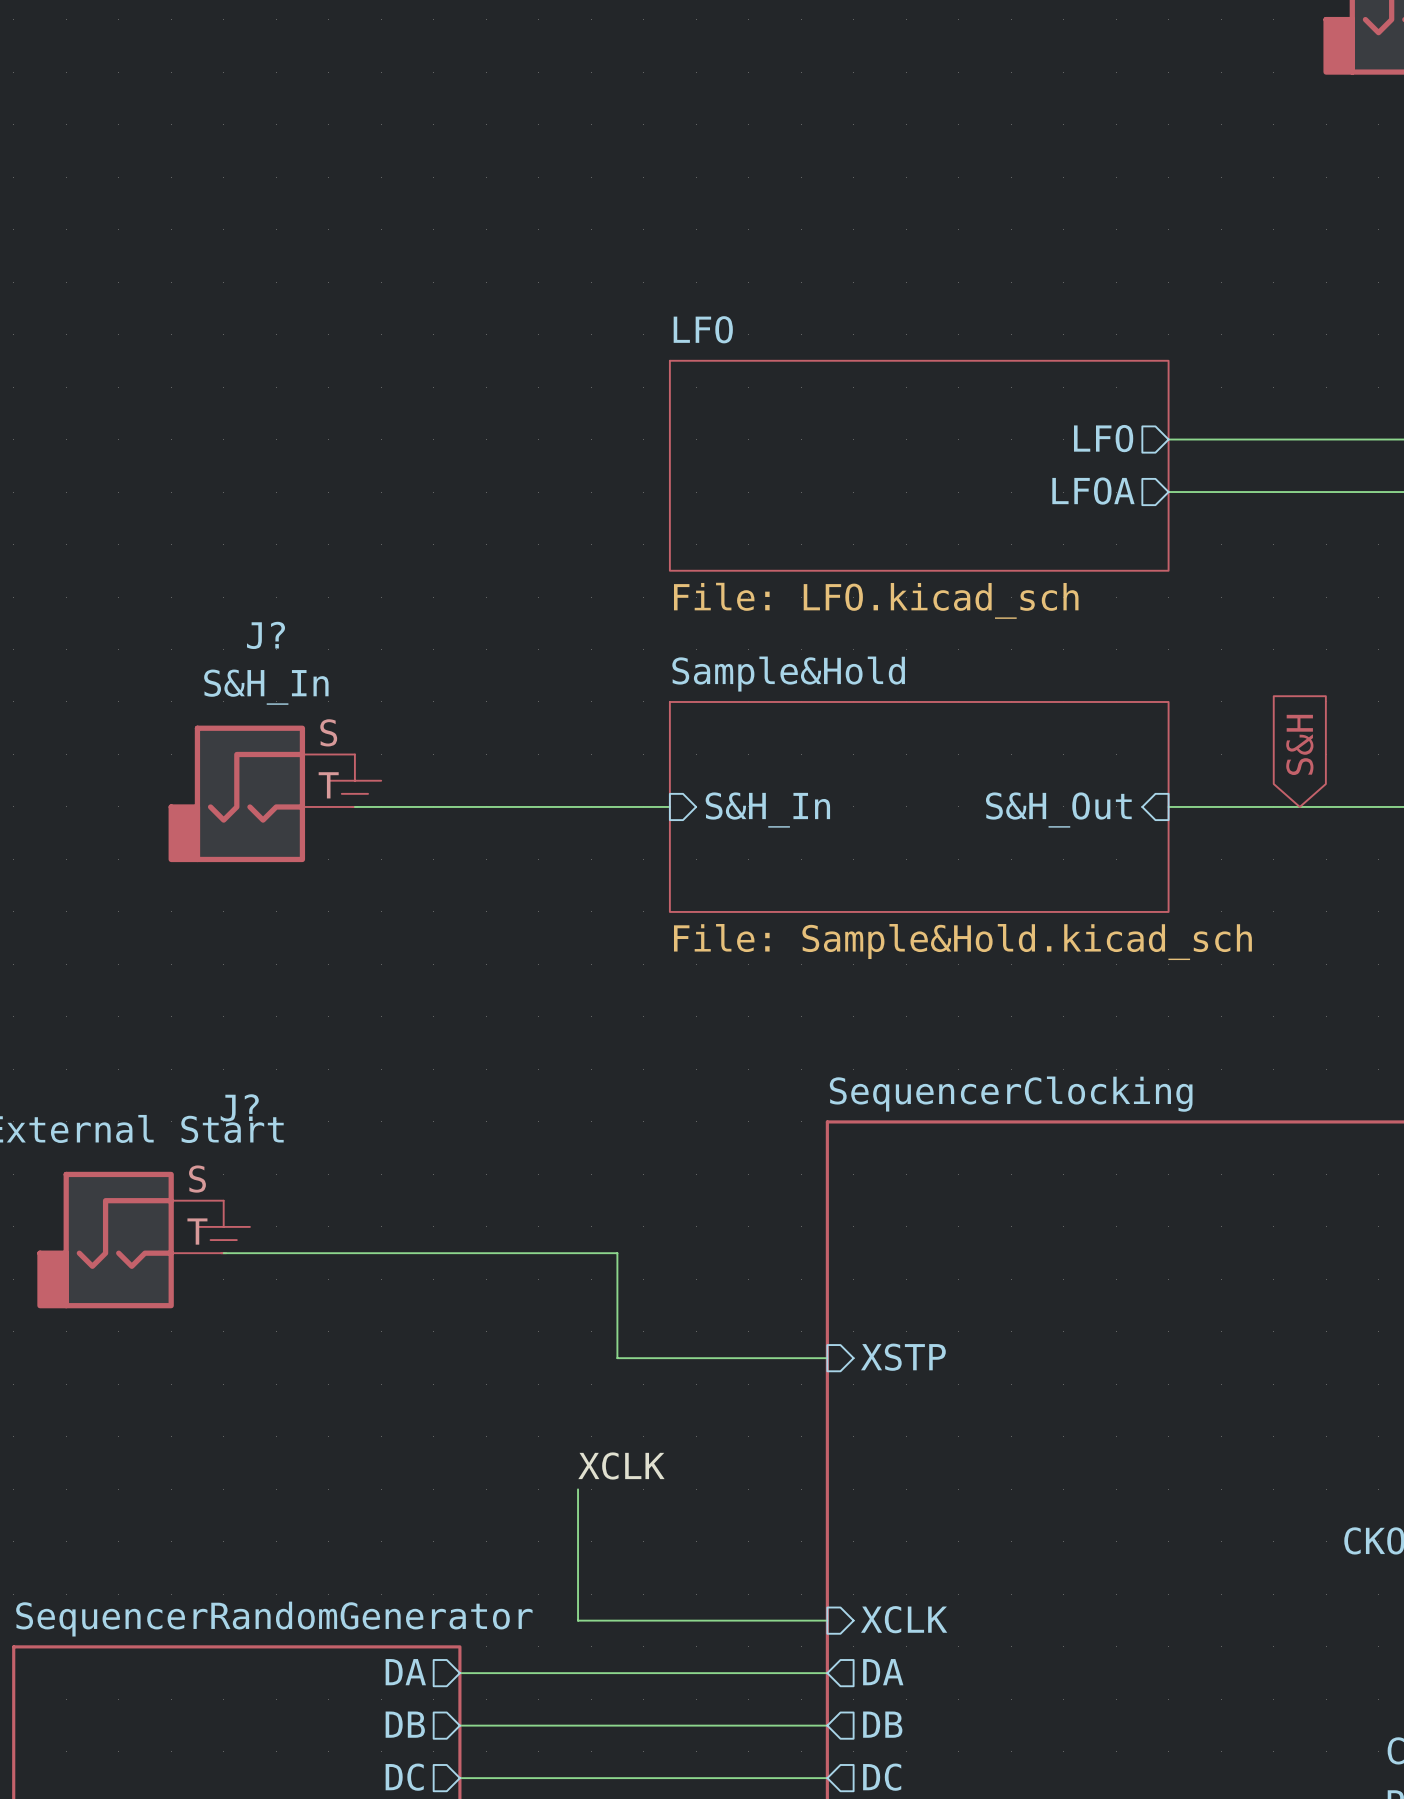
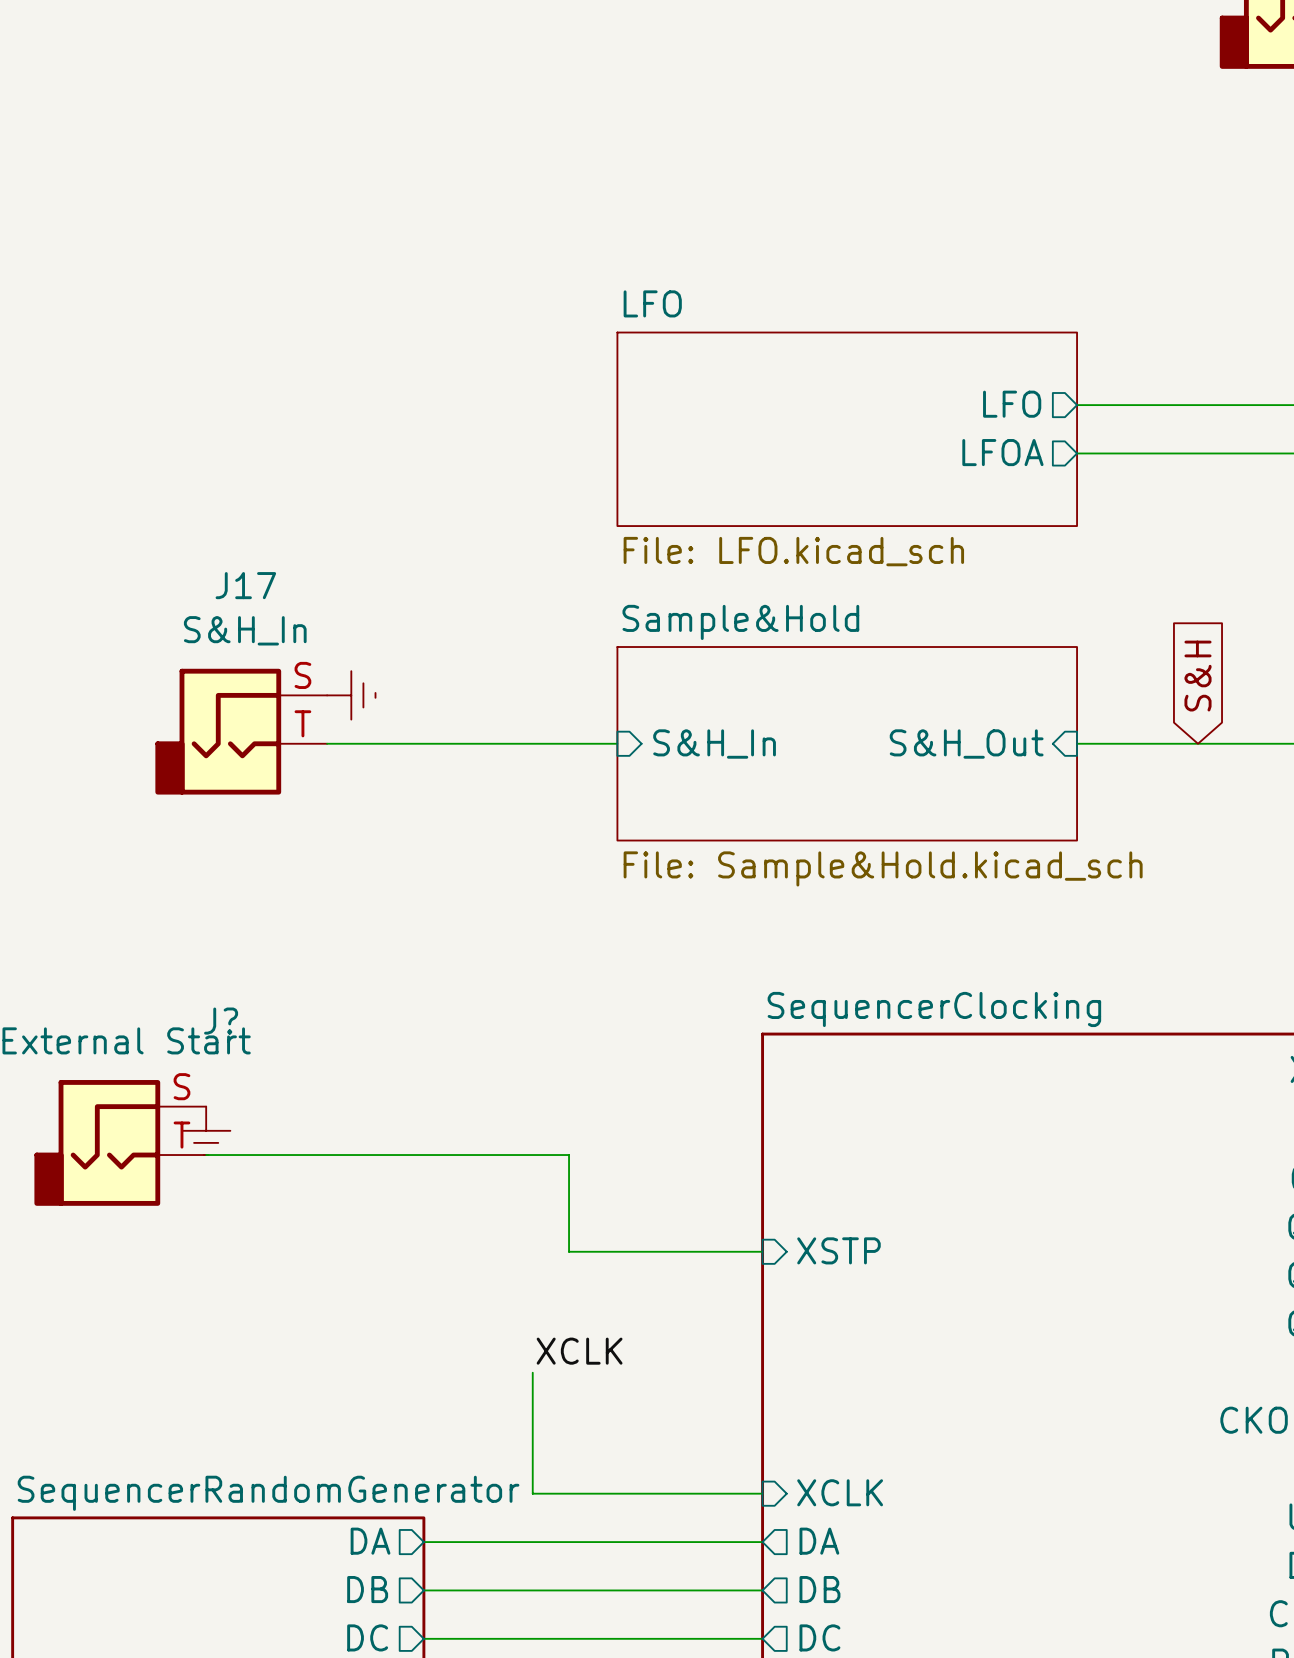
J? name: J? (266, 635) -> J17 (245, 585)
power symbol rotation: 0° (354, 780) -> 90° counterclockwise (351, 695)
power symbol position: (354, 780) -> (351, 695)

